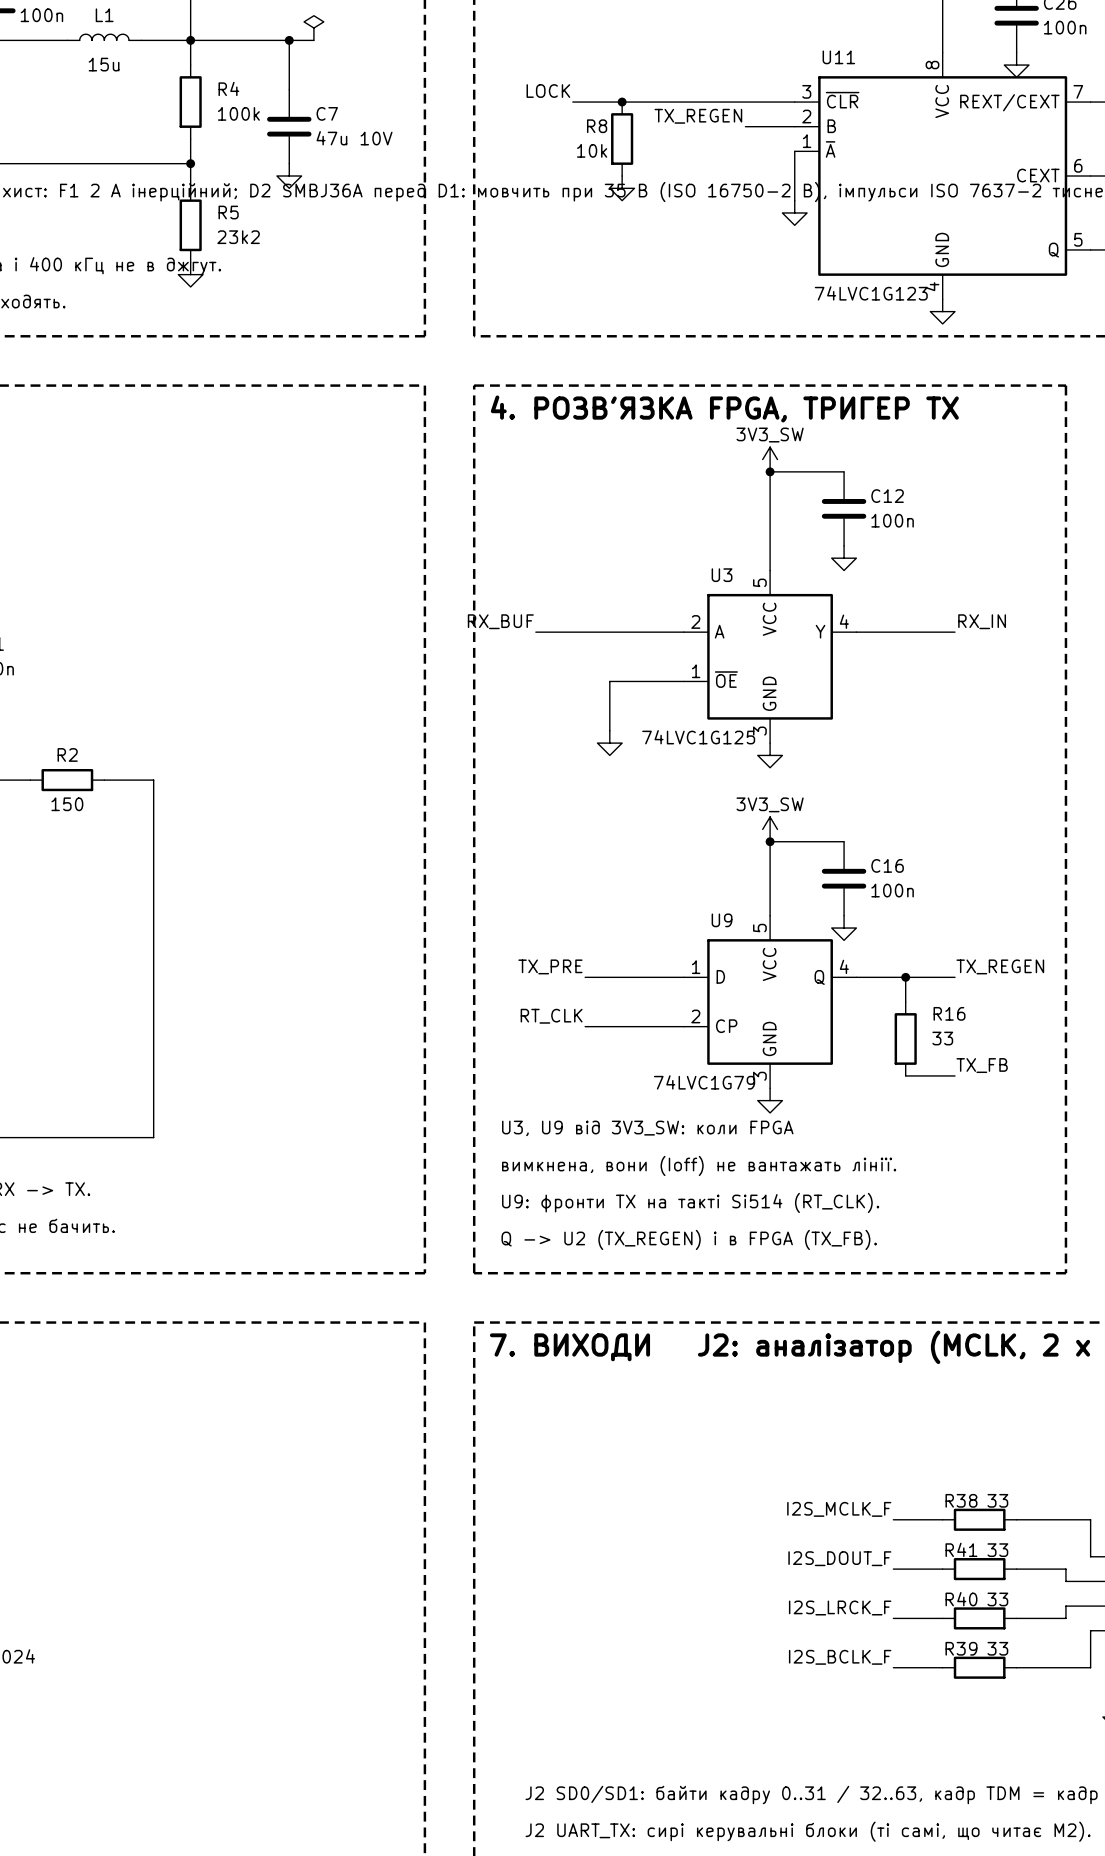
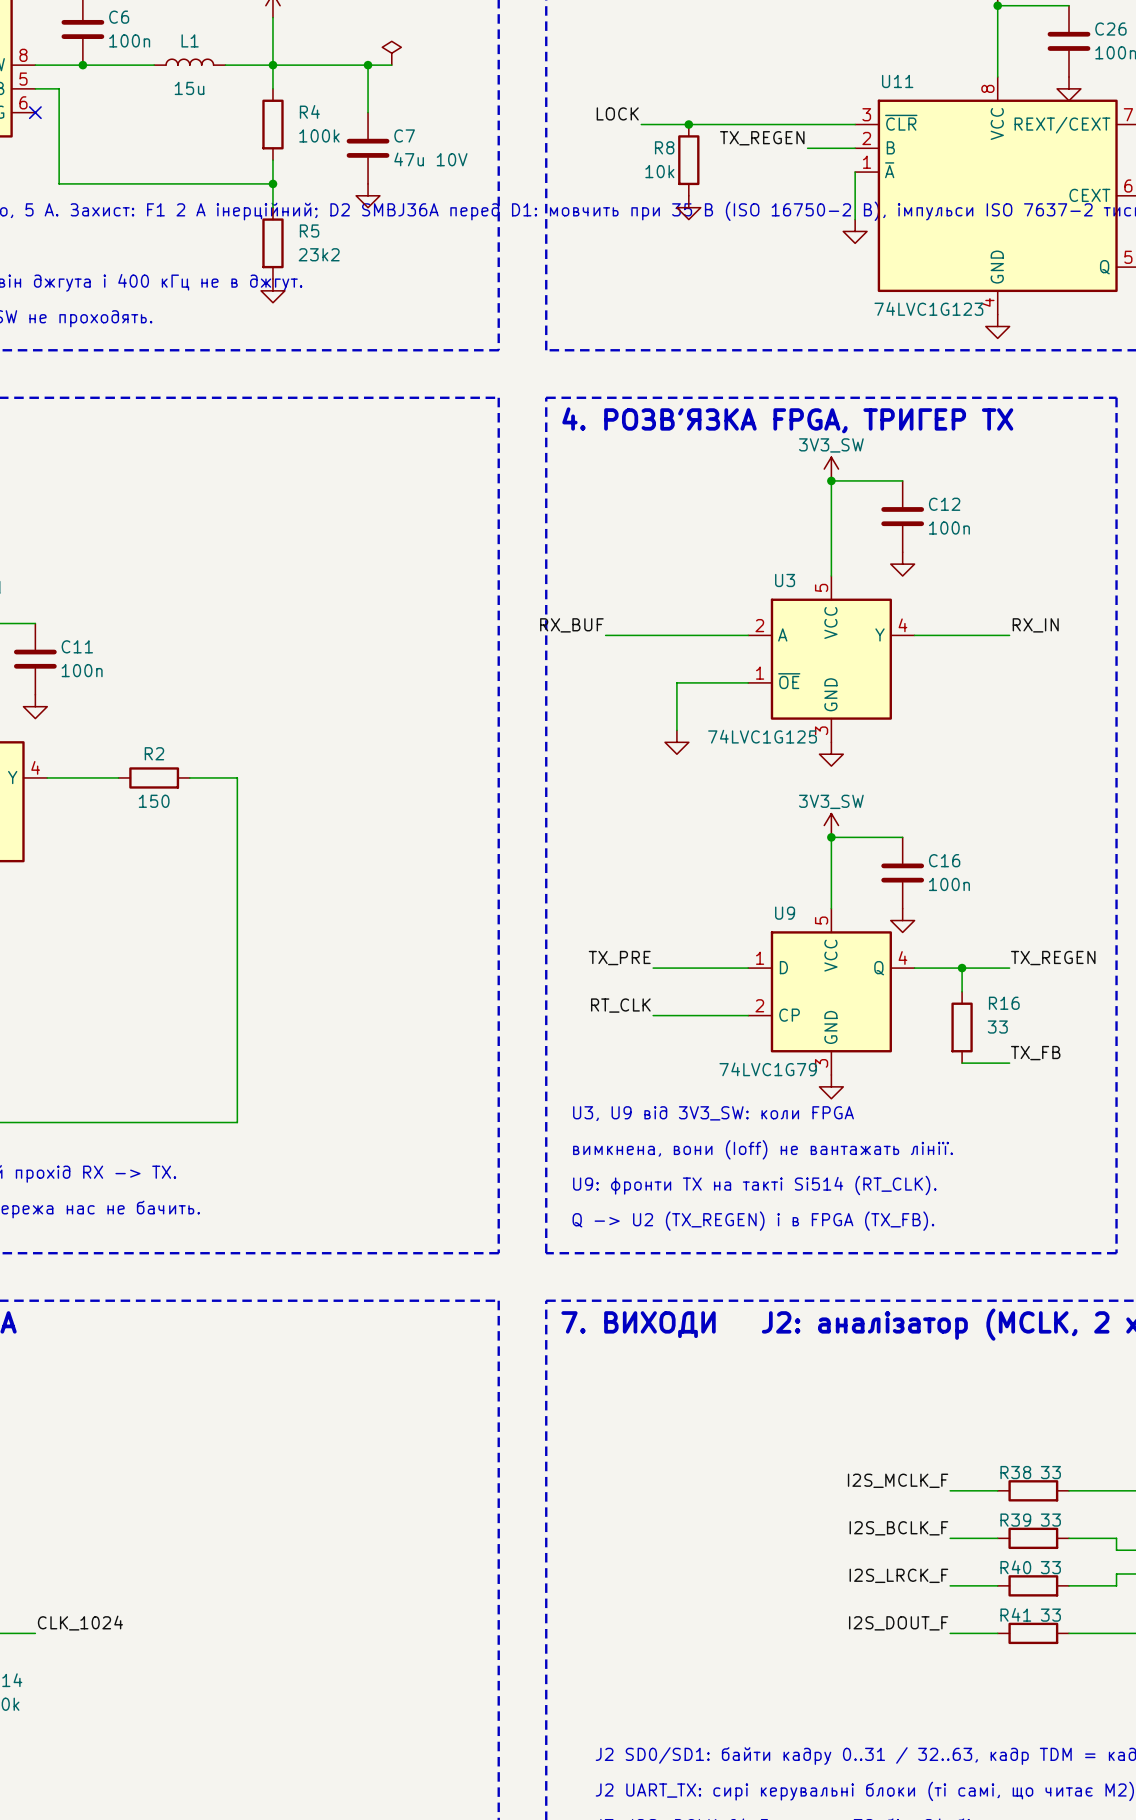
R41 name: R41 (961, 1549) -> R39 (1015, 1520)
label: I2S_DOUT_F (839, 1558) -> I2S_BCLK_F (898, 1528)
R39 name: R39 (961, 1648) -> R41 (1015, 1614)
label: I2S_BCLK_F (840, 1657) -> I2S_DOUT_F (898, 1623)

